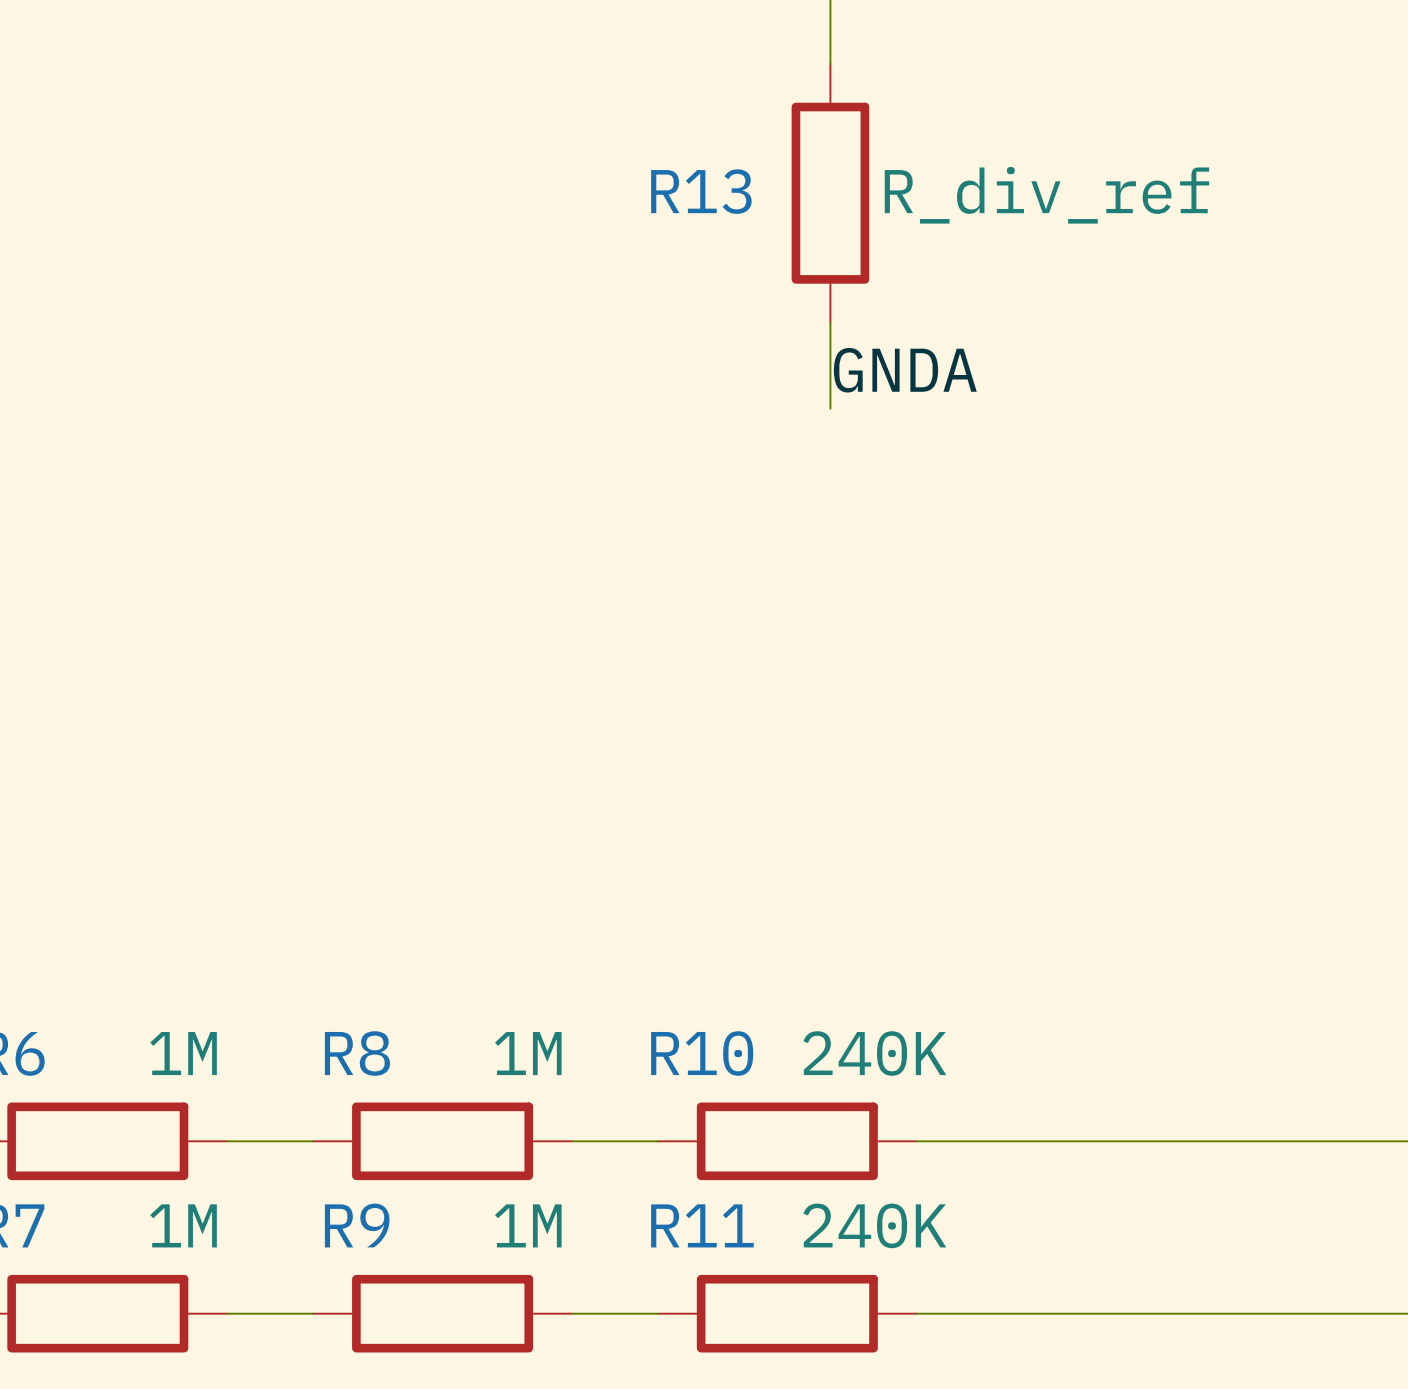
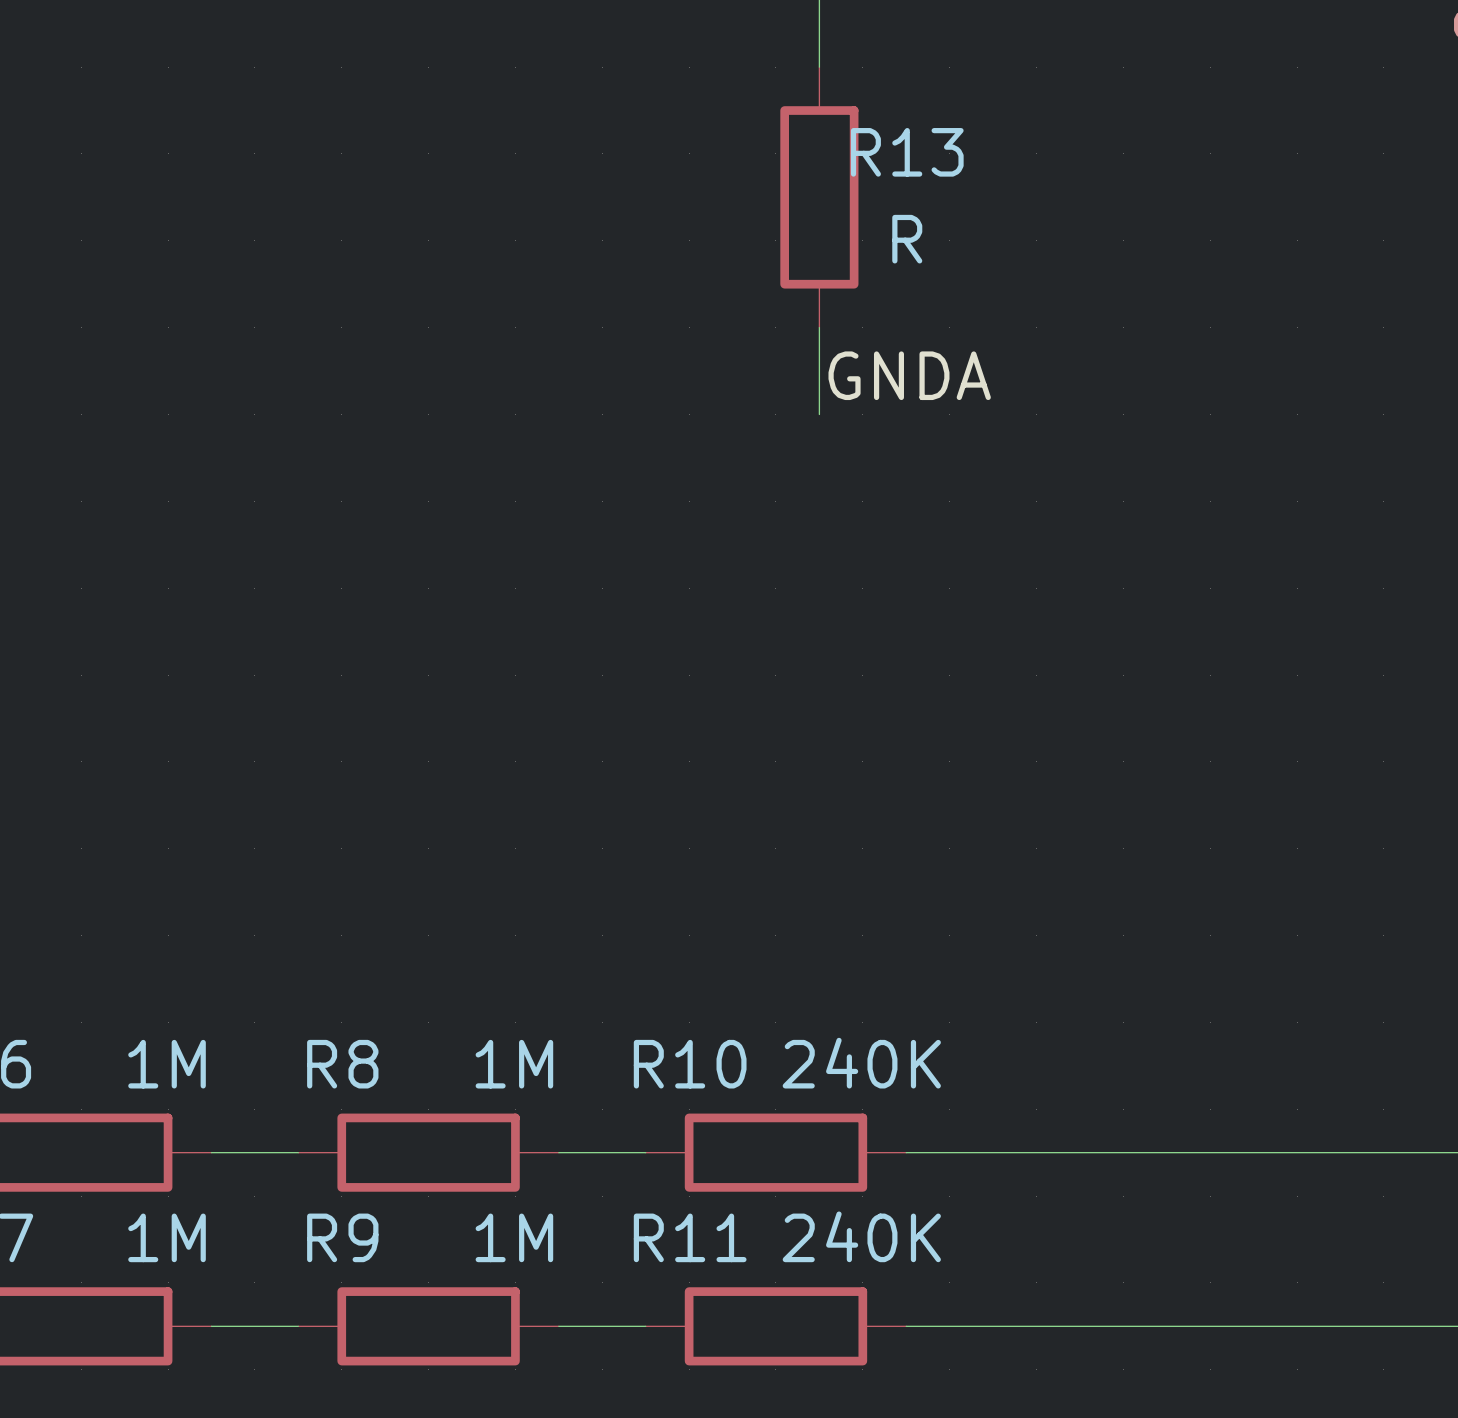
R13 name position: R13 (701, 191) -> R13 (907, 152)
R13 value: R_div_ref (1046, 195) -> R (907, 239)

